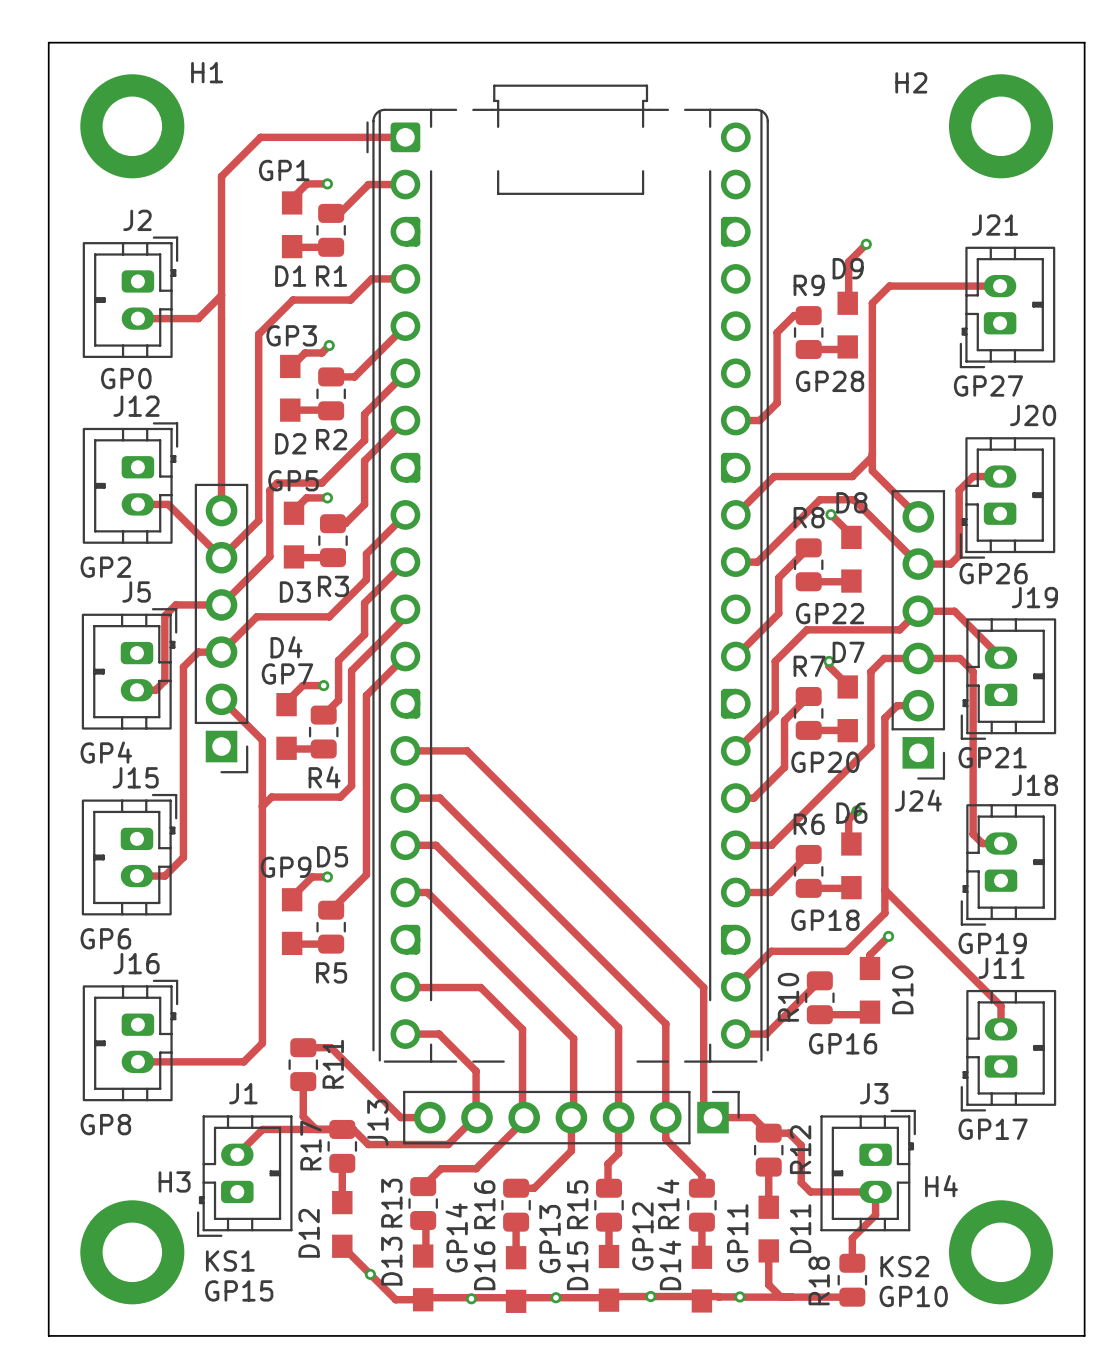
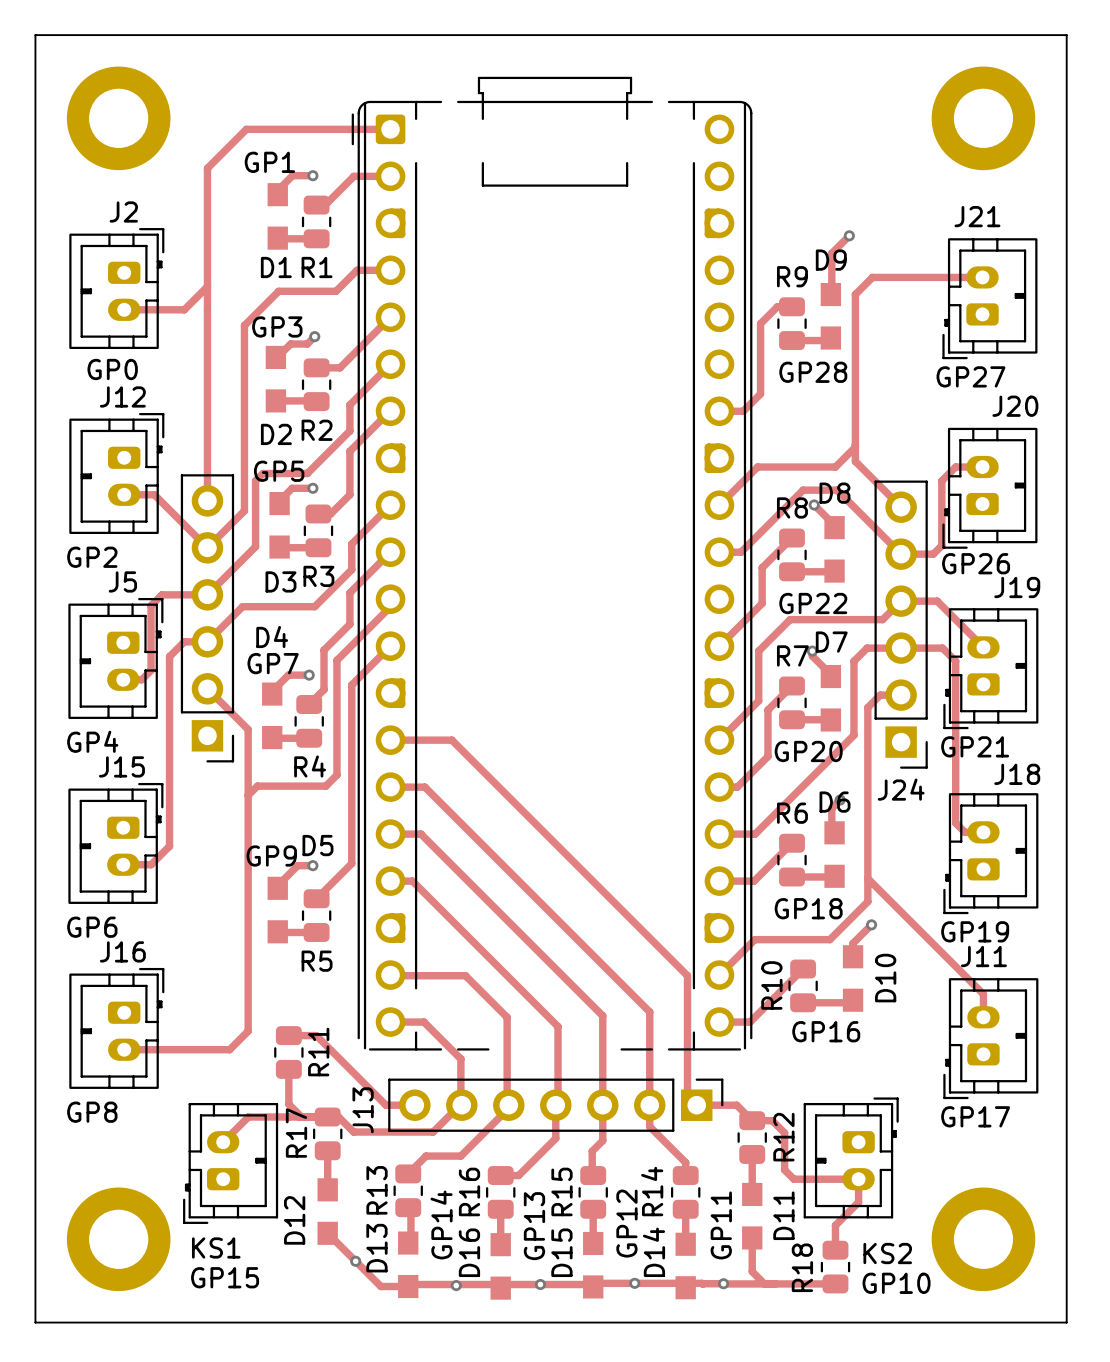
H1 name: H1 (207, 72) -> none
H2 name: H2 (911, 82) -> none
J1 name: J1 (243, 1093) -> none
J3 name: J3 (874, 1093) -> none
H3 name: H3 (174, 1181) -> none
H4 name: H4 (941, 1186) -> none

